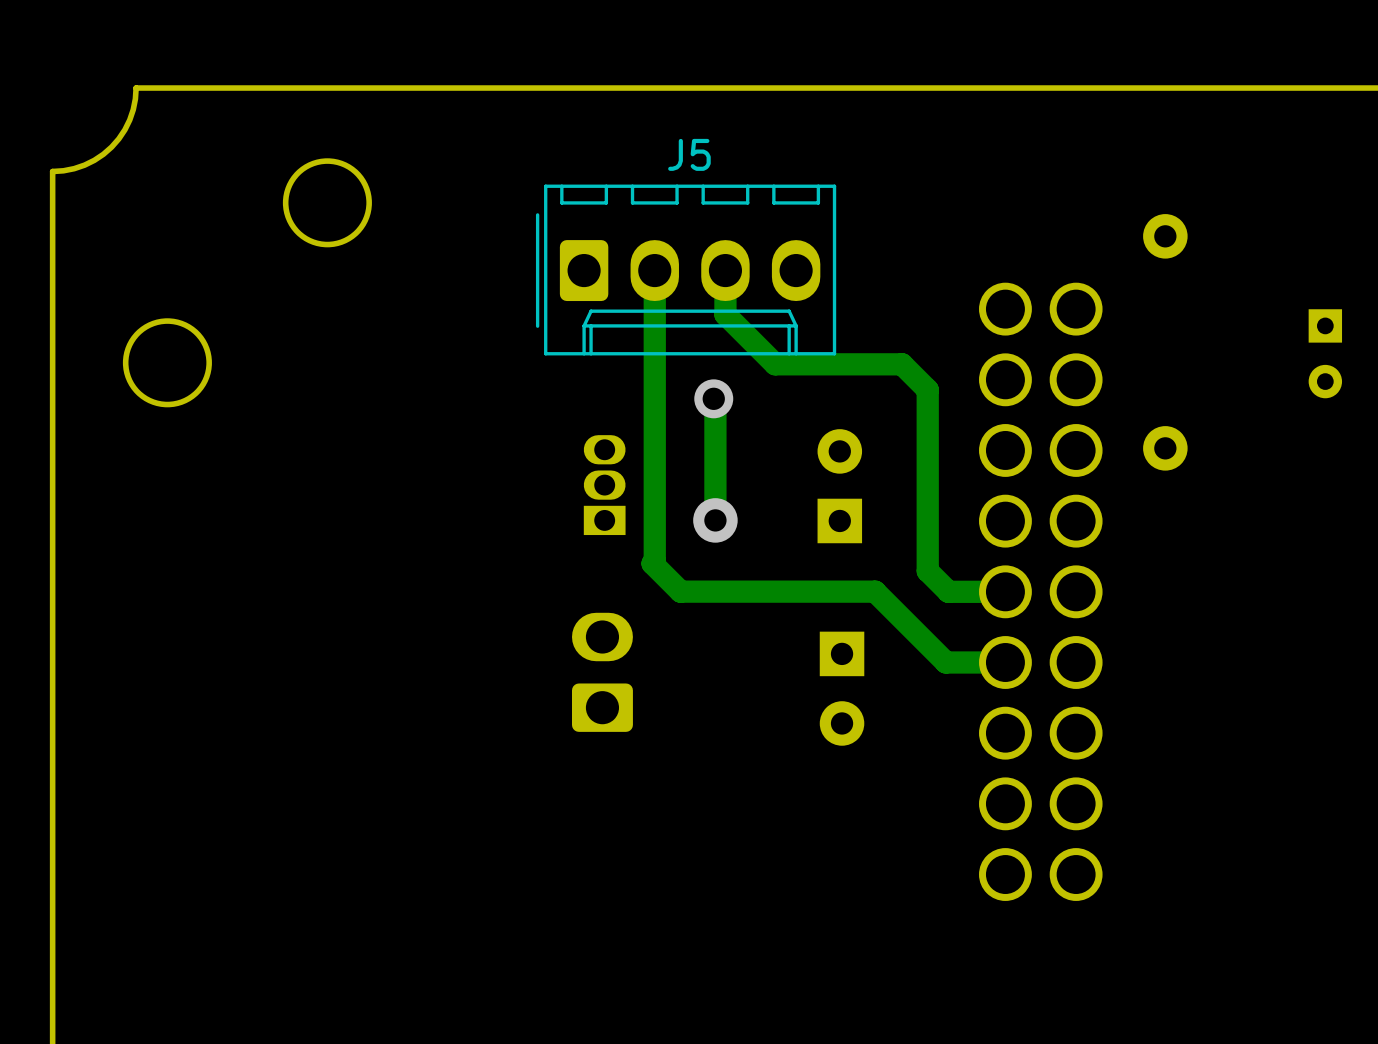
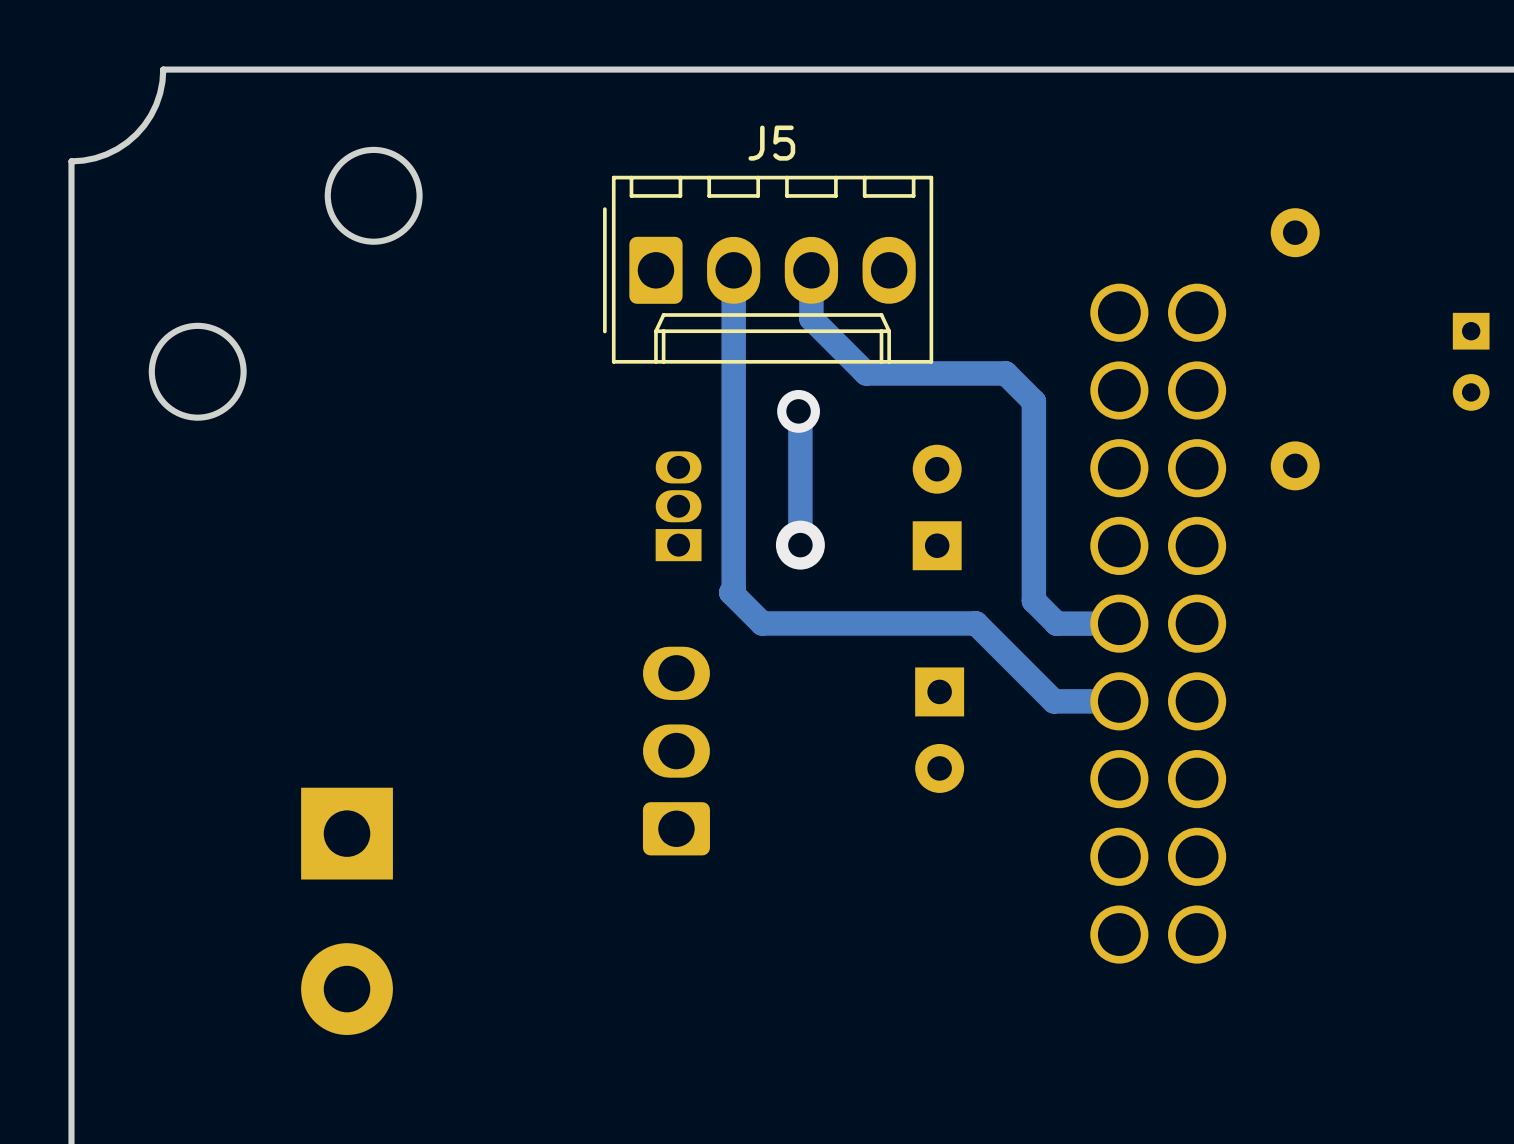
part: (602, 672) -> none
part: none -> (676, 751)
part: none -> (347, 911)

